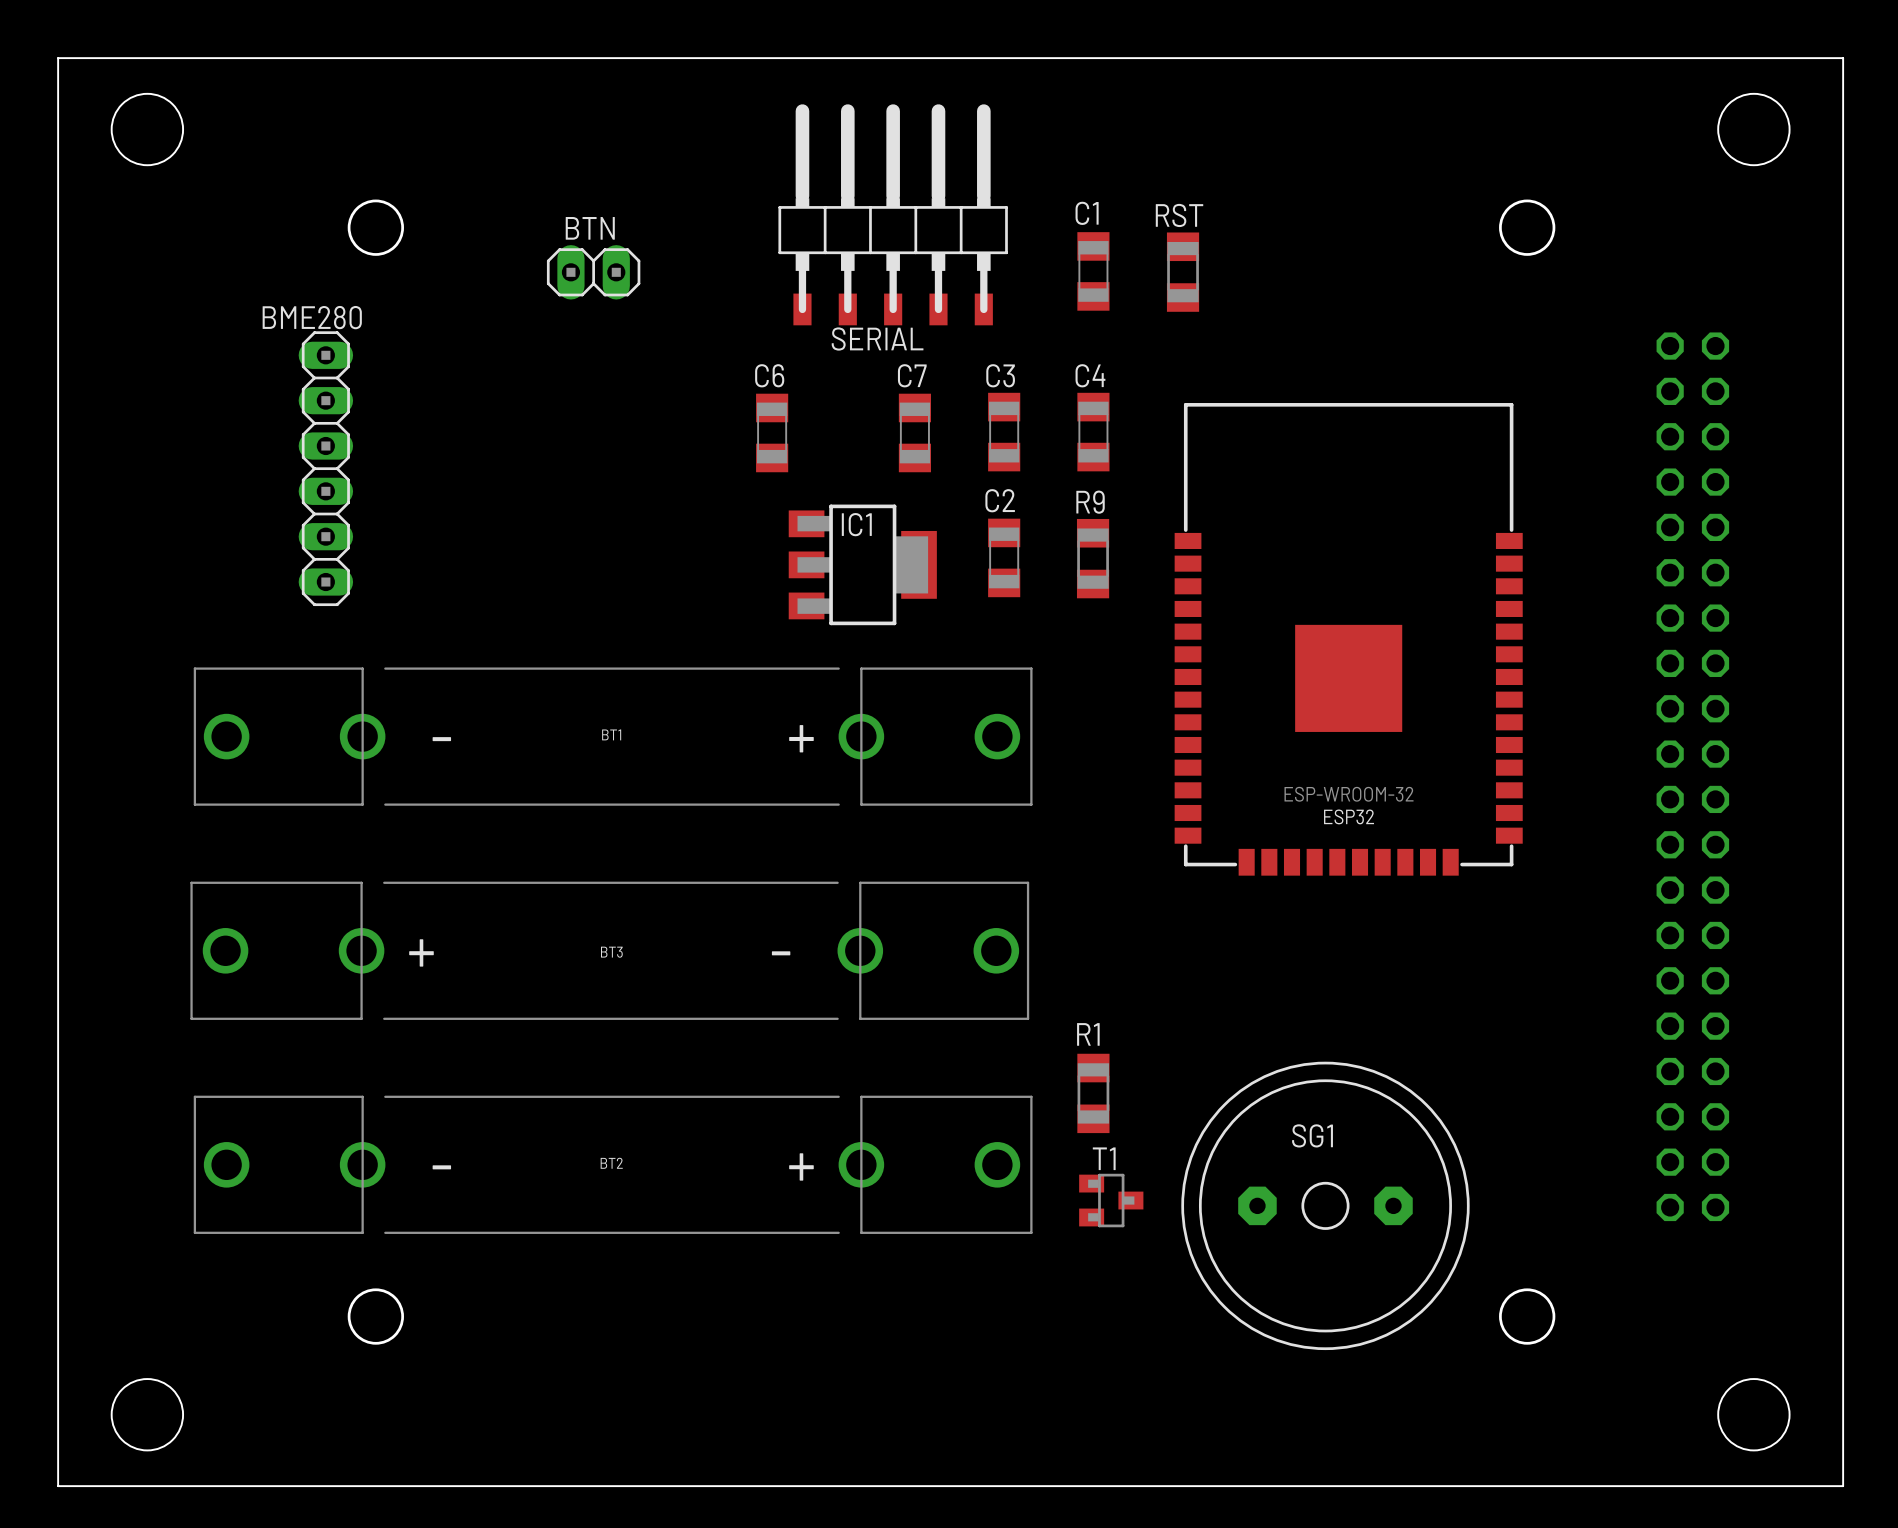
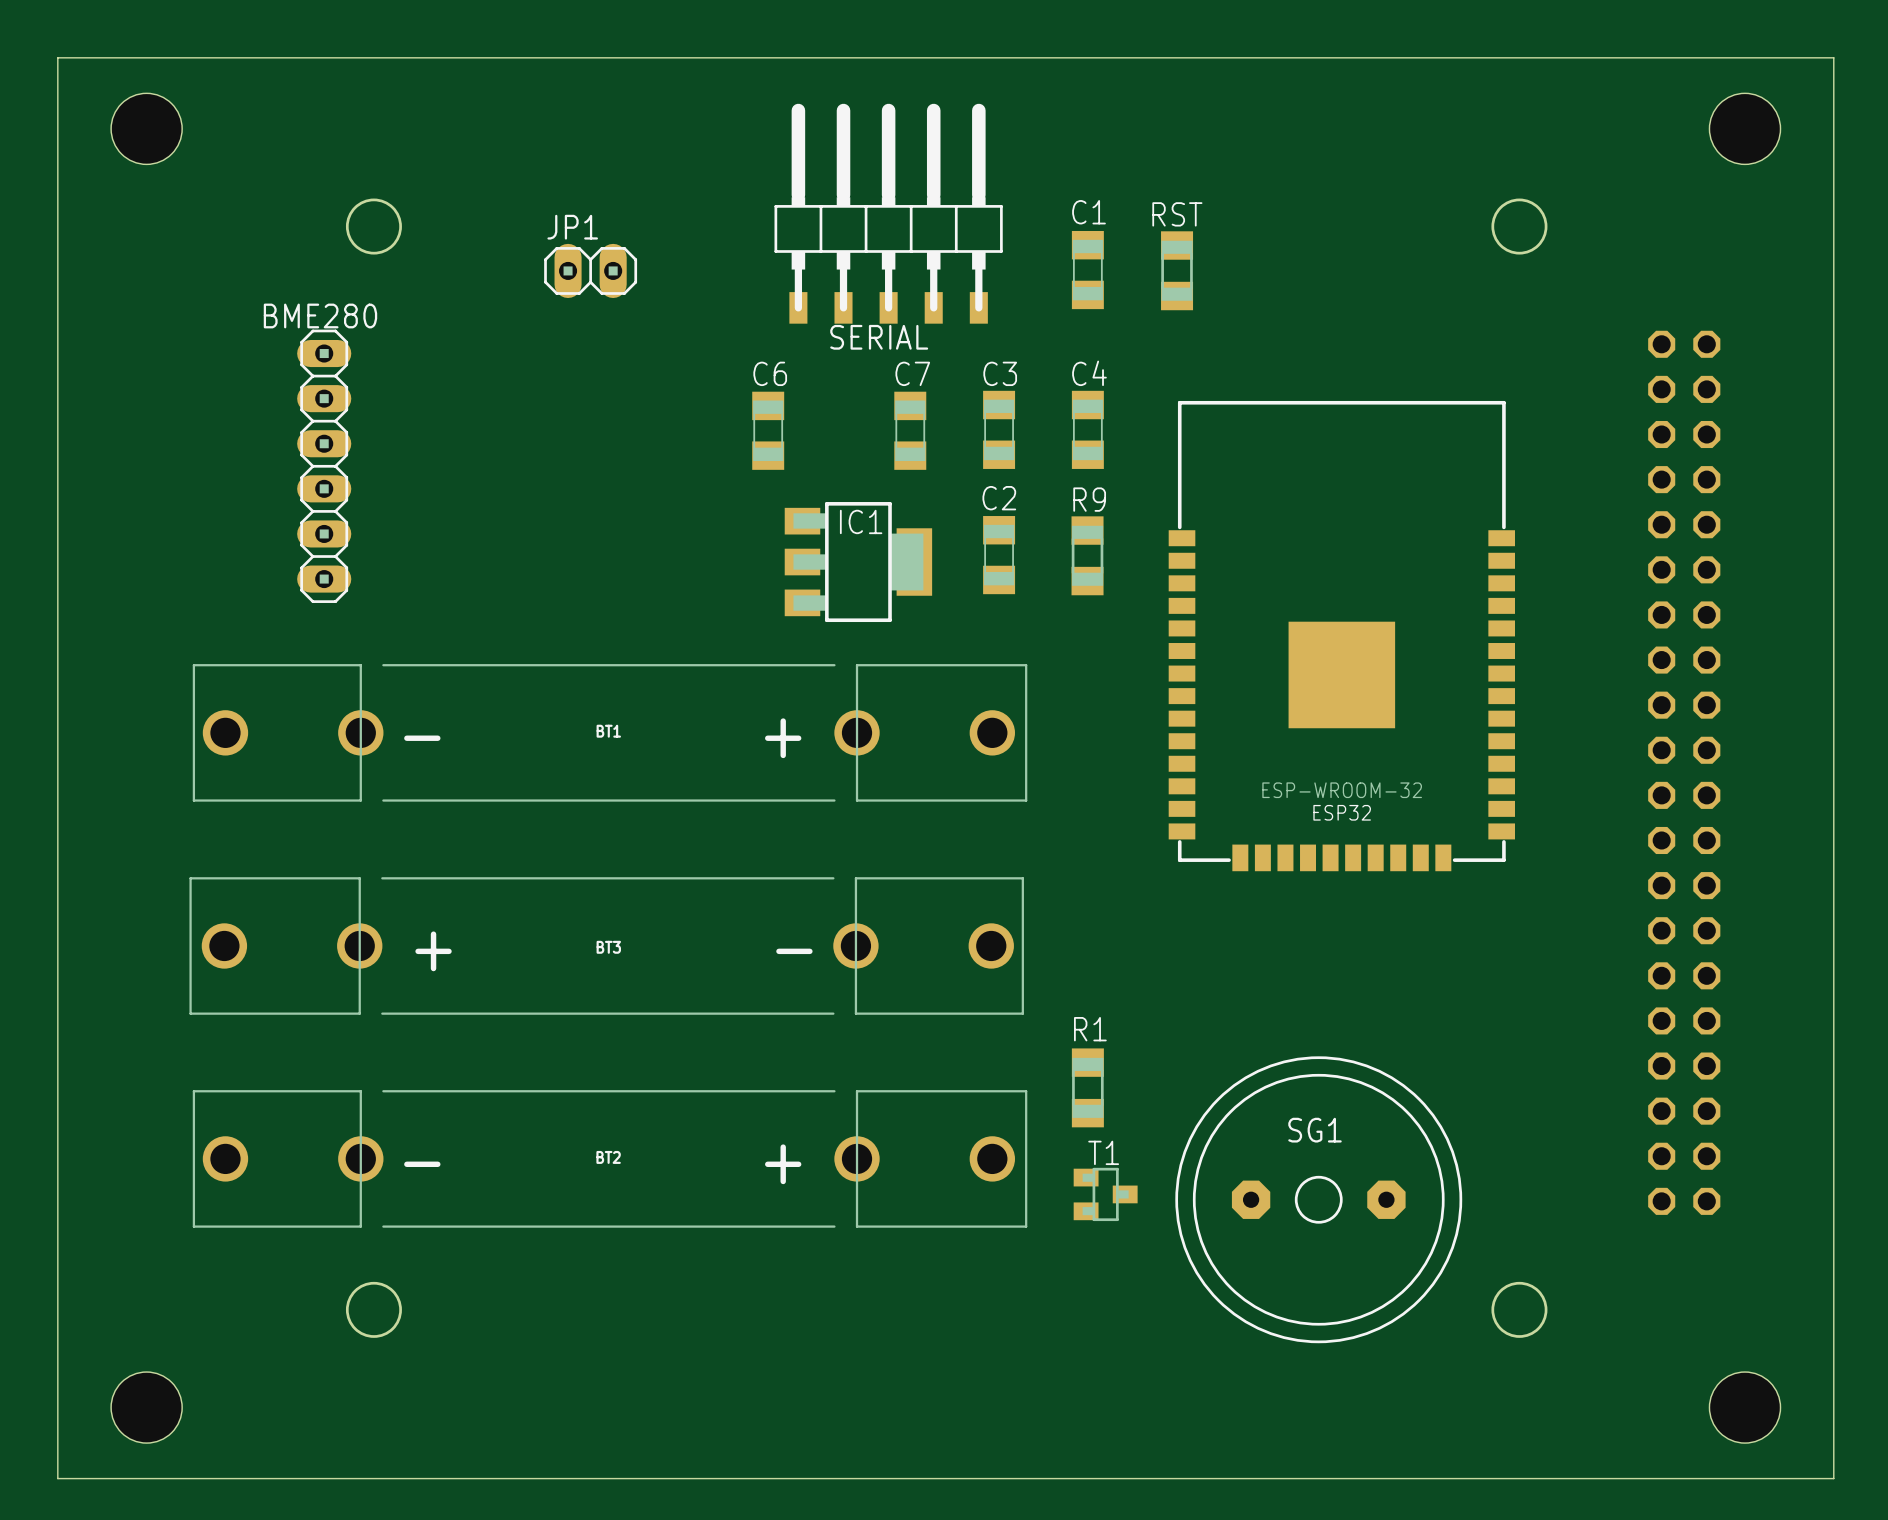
BTN name: BTN (590, 228) -> JP1 (572, 227)

